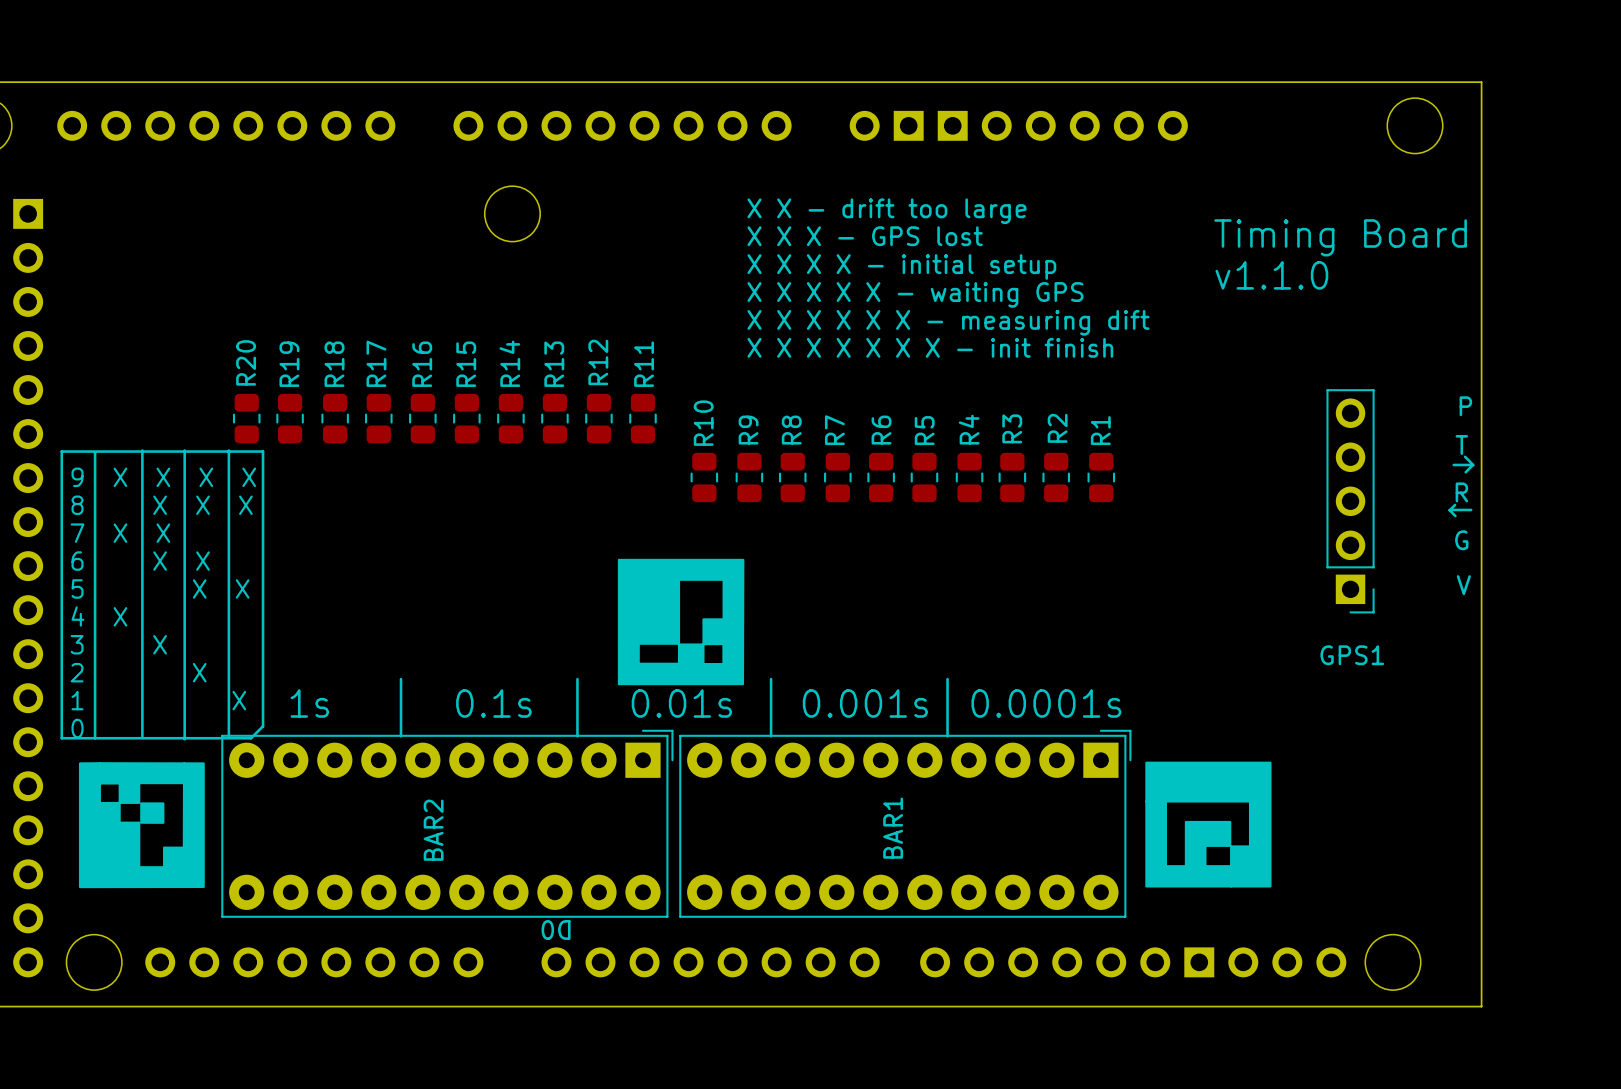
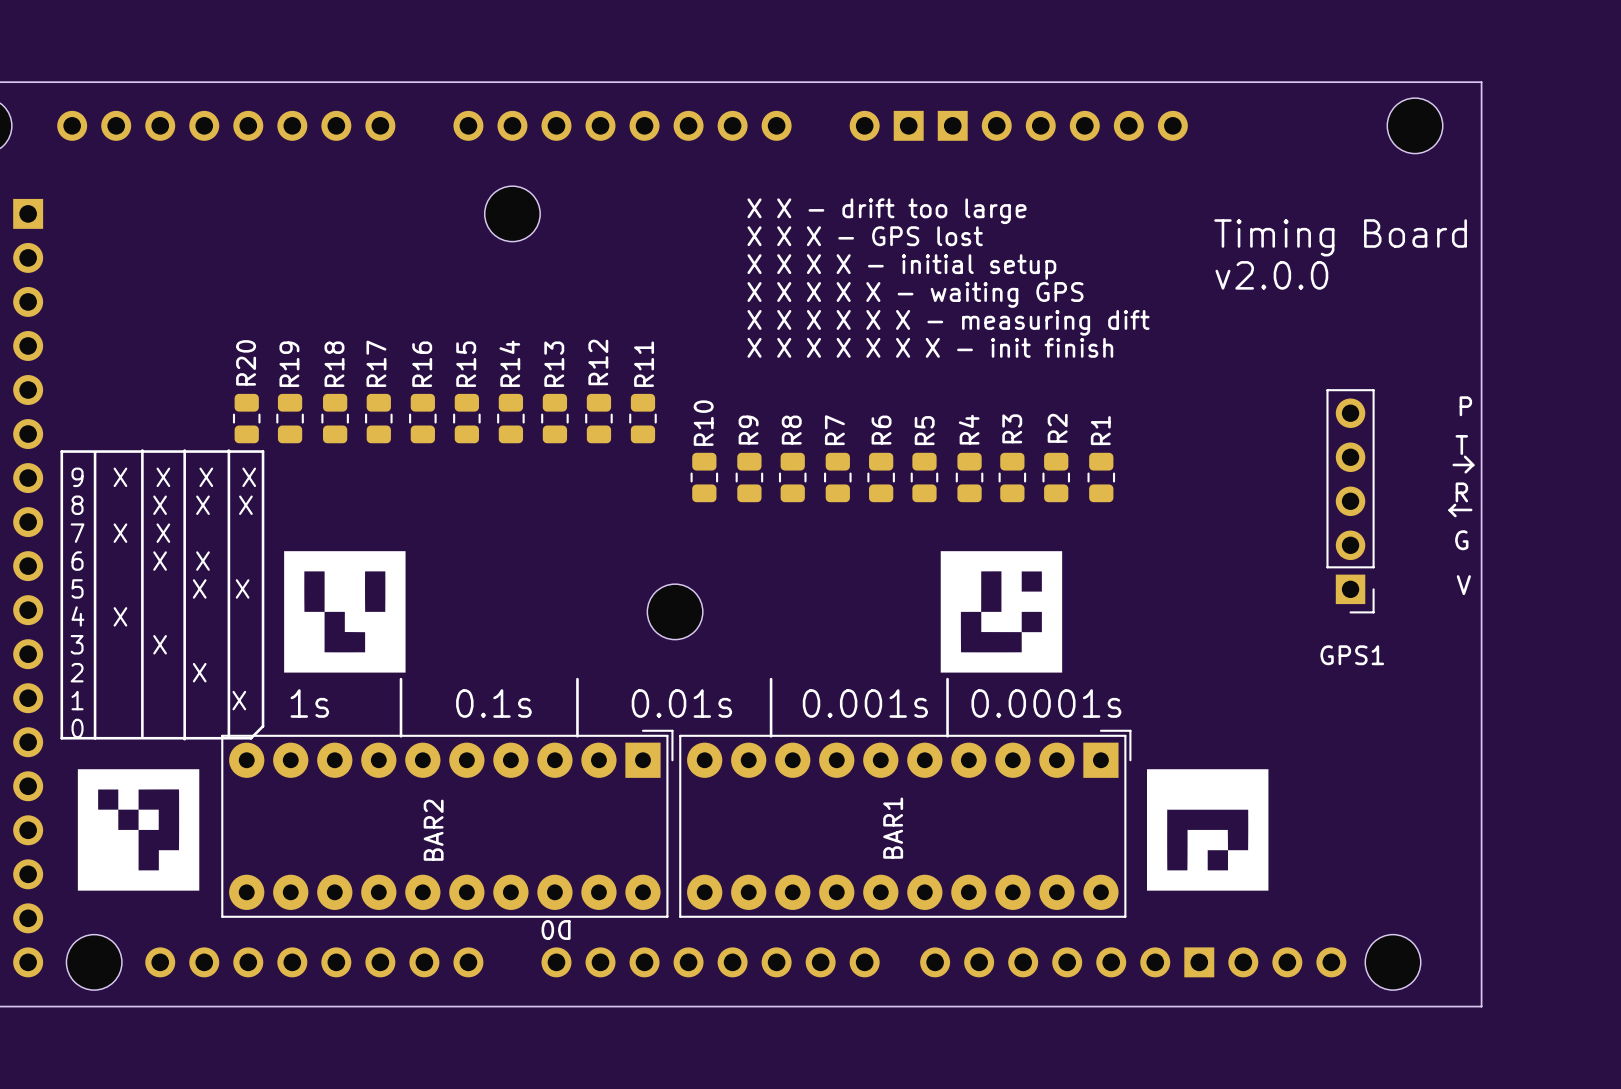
text: v1.1.0 (1271, 275) -> v2.0.0 (1271, 275)
drawing: none -> [284, 551, 406, 673]
drawing: none -> [940, 551, 1063, 673]
drawing: [617, 558, 745, 686] -> none
part: none -> (675, 611)
drawing shape: [1145, 761, 1272, 888] -> [1146, 769, 1269, 891]
drawing shape: [78, 762, 205, 889] -> [77, 769, 200, 891]

